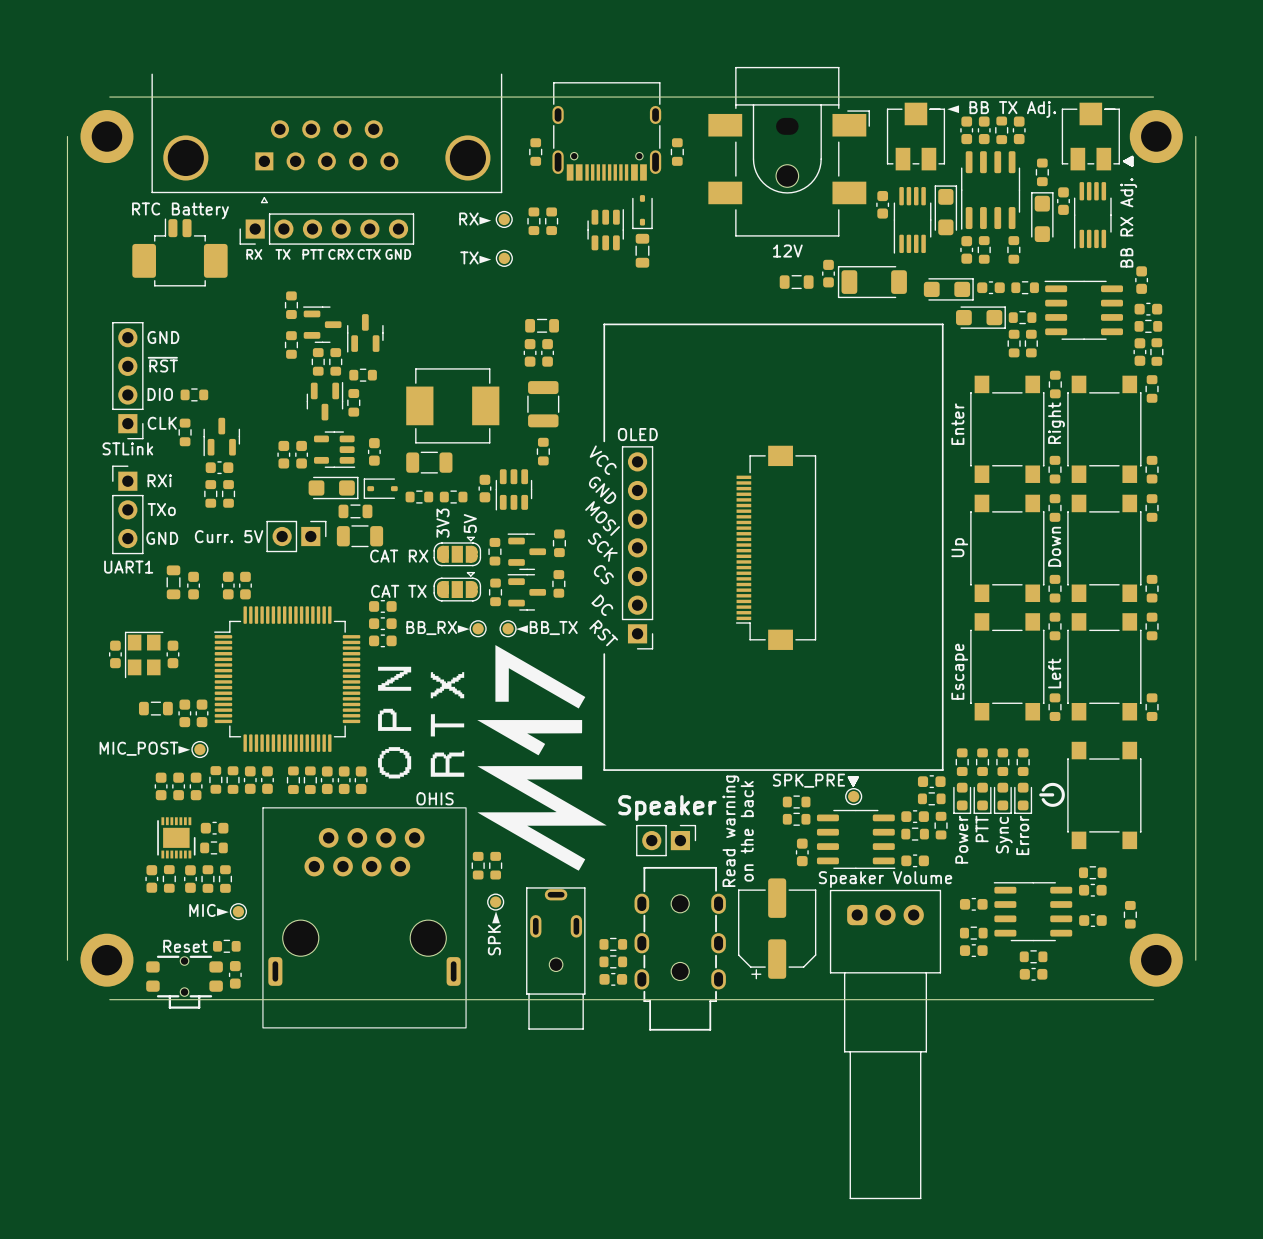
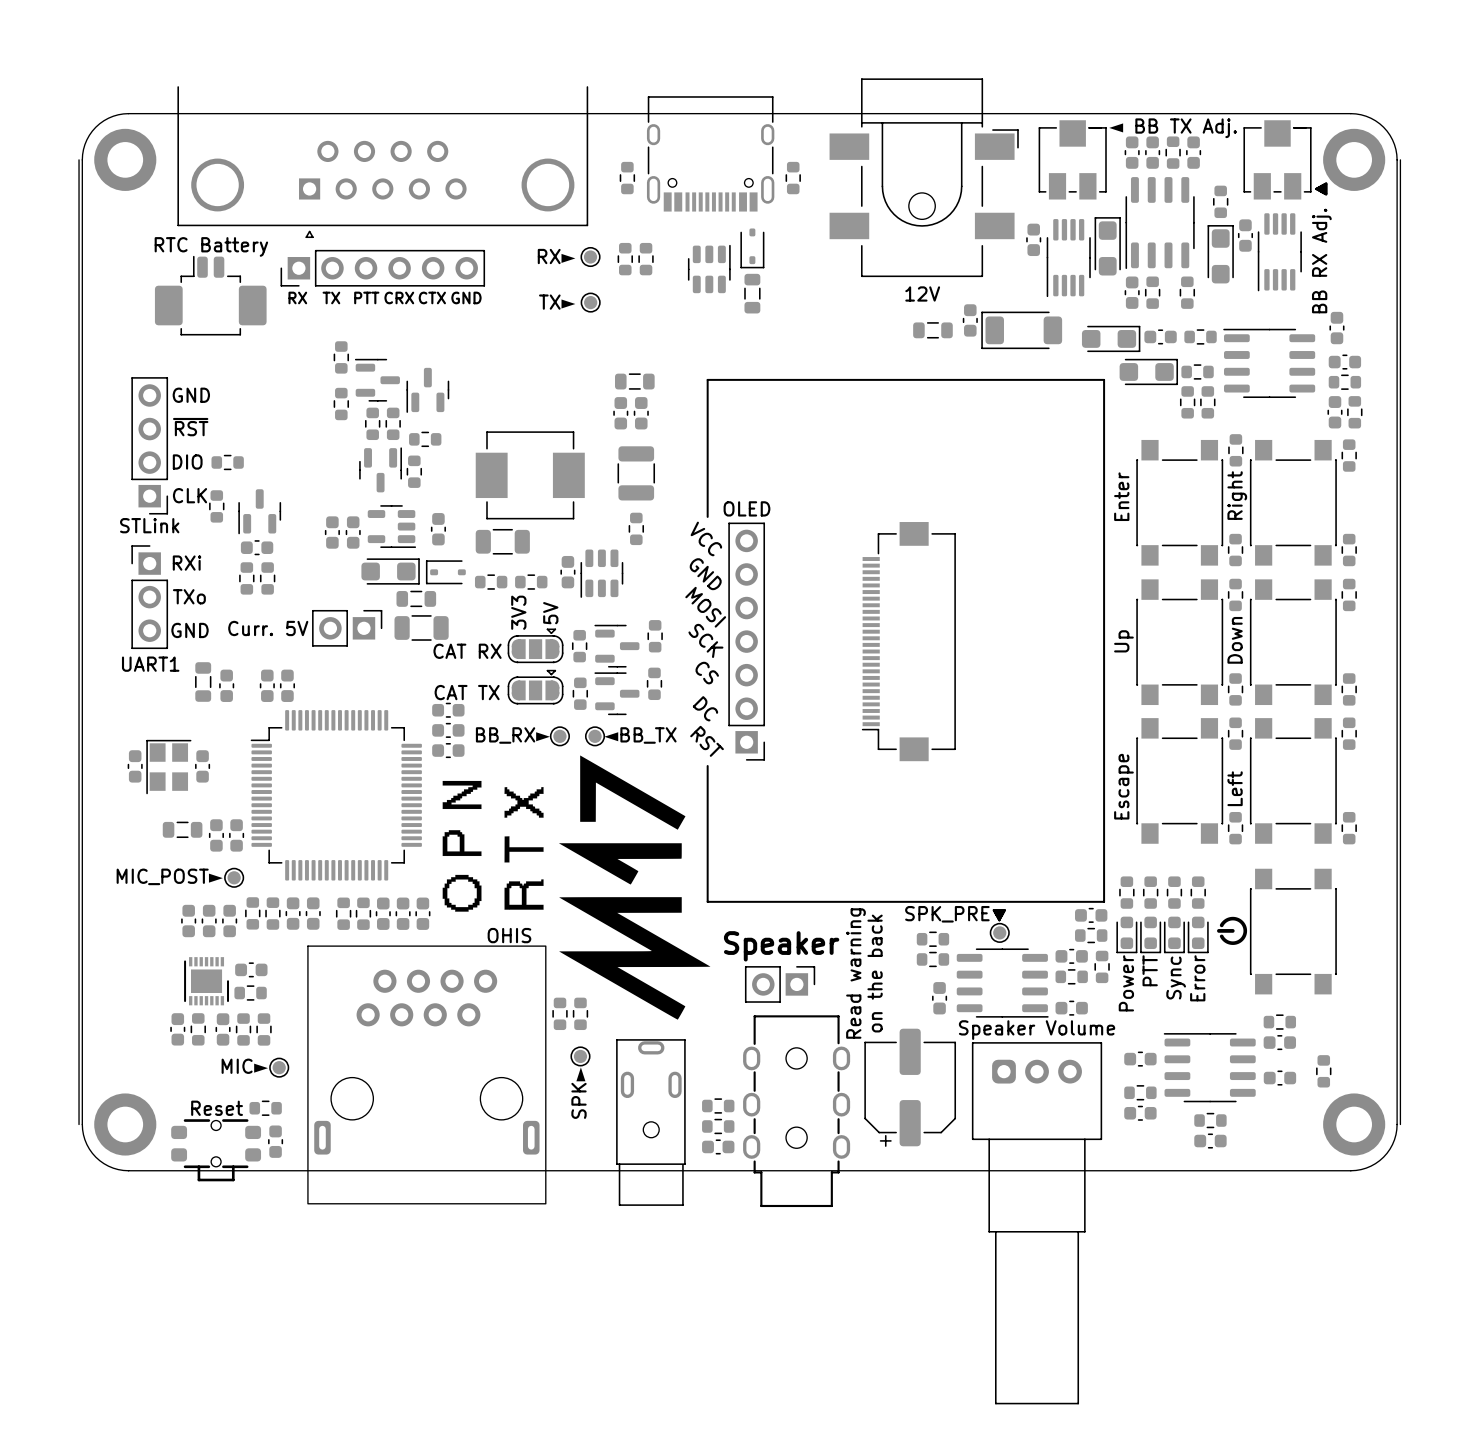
board edge: none -> (128, 113) (108, 118) (95, 127) (84, 144) (82, 159) (82, 1124) (86, 1144) (95, 1157) (113, 1168) (128, 1170)
board edge: none -> (1350, 113) (1370, 118) (1383, 127) (1394, 144) (1397, 159) (1397, 1124) (1394, 1139) (1383, 1157) (1370, 1166) (1350, 1170)

